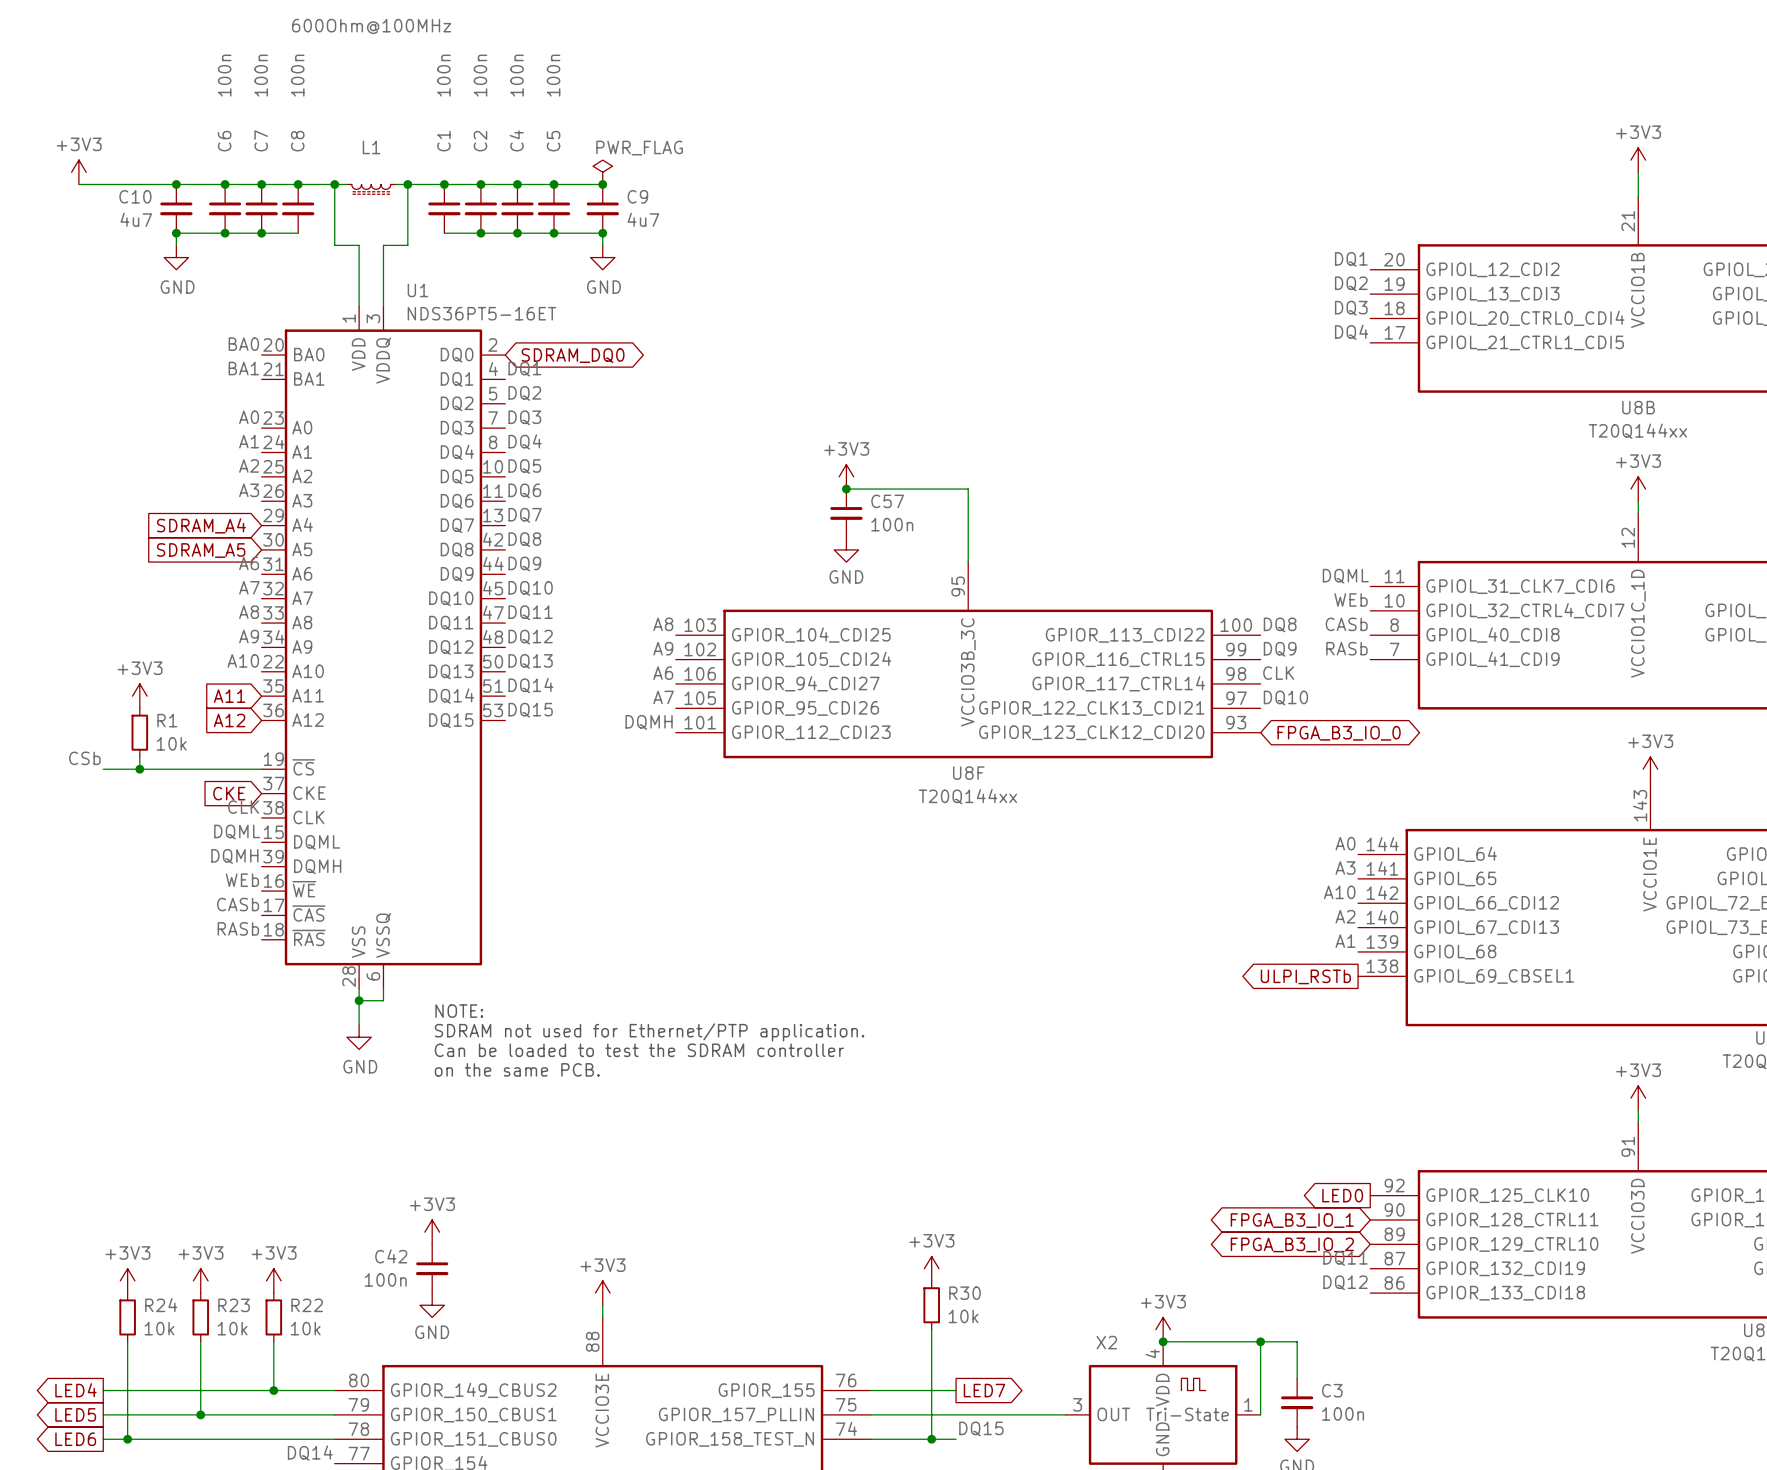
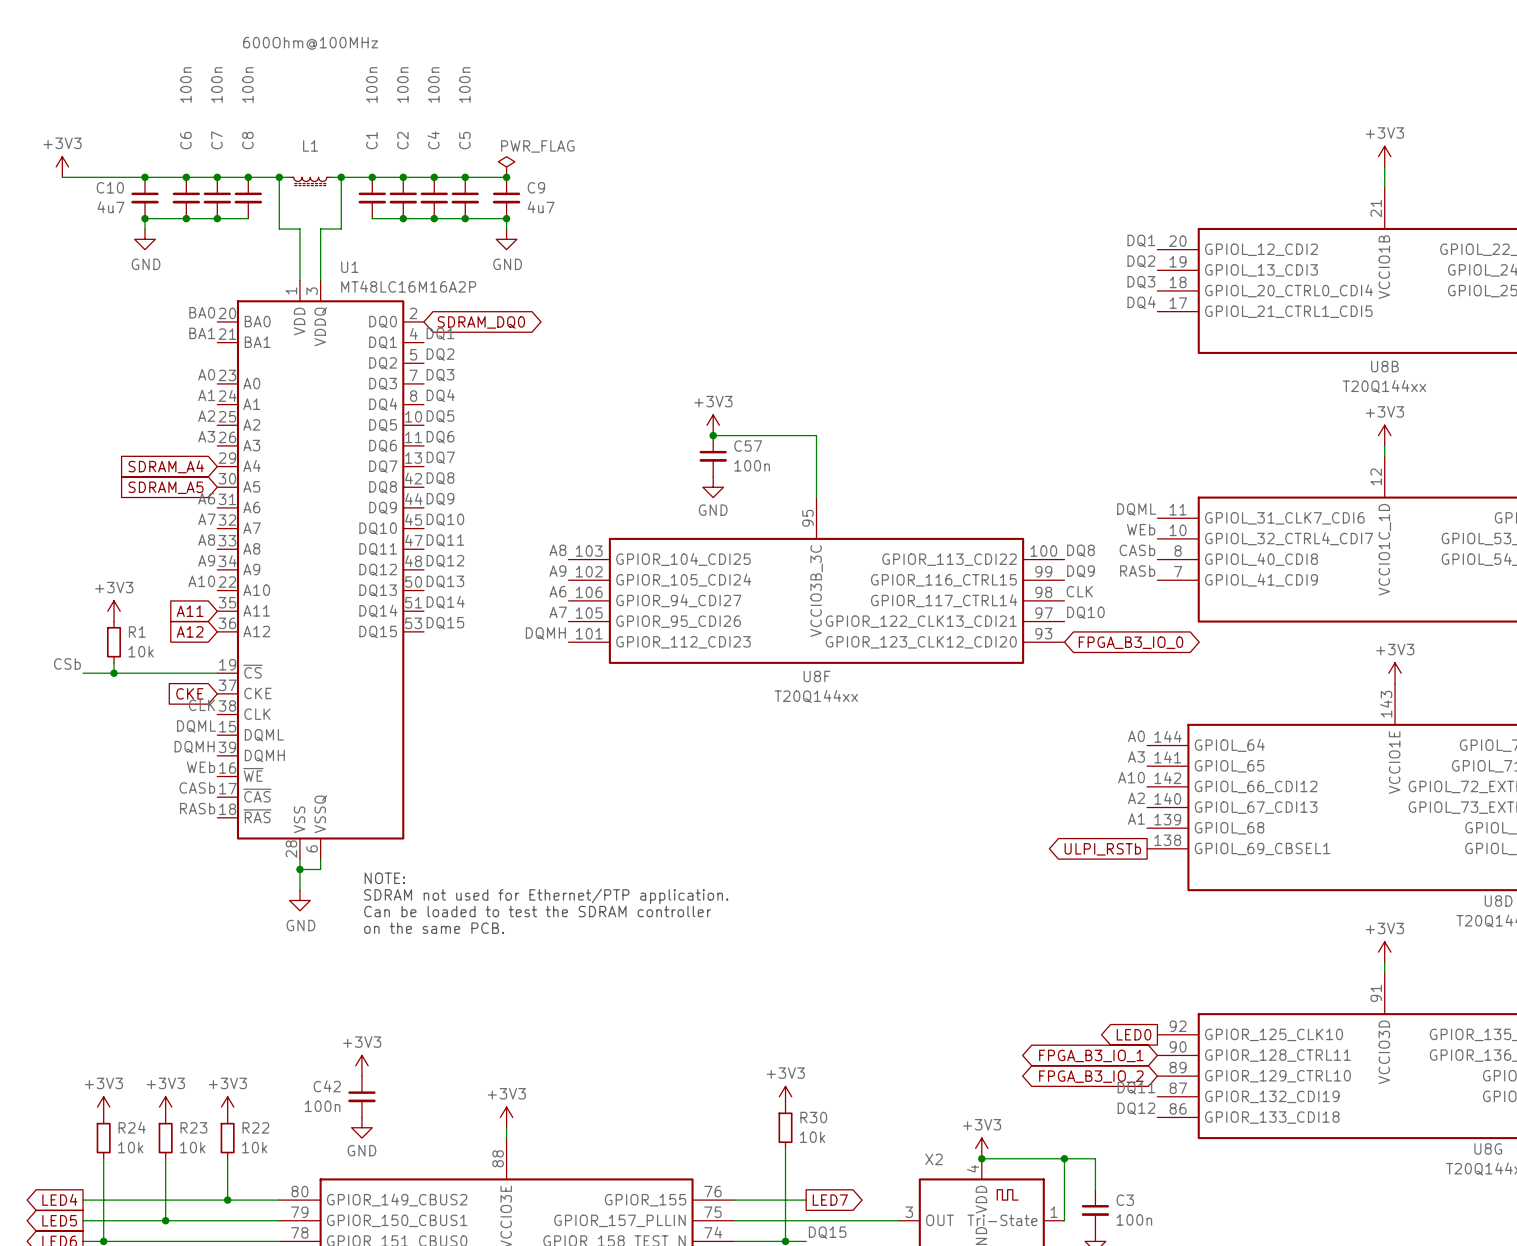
U1 value: NDS36PT5-16ET (482, 313) -> MT48LC16M16A2P (408, 286)

